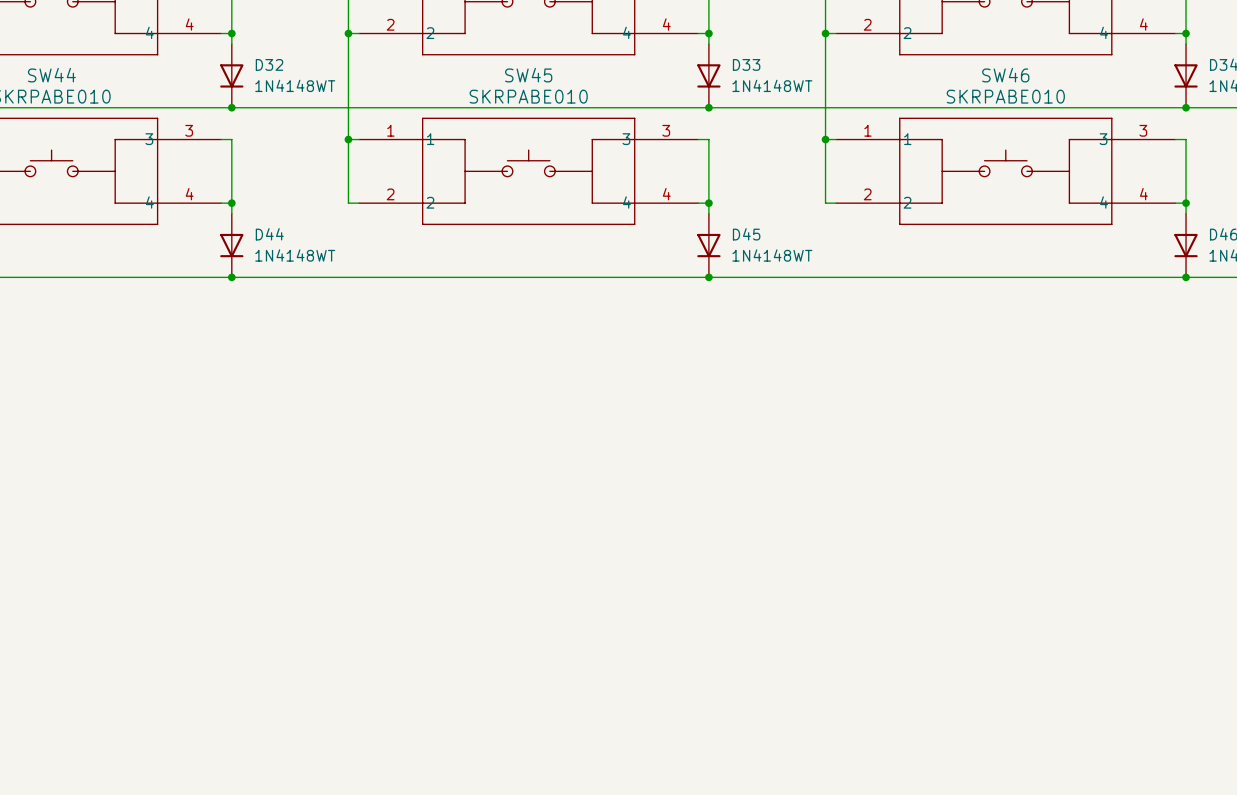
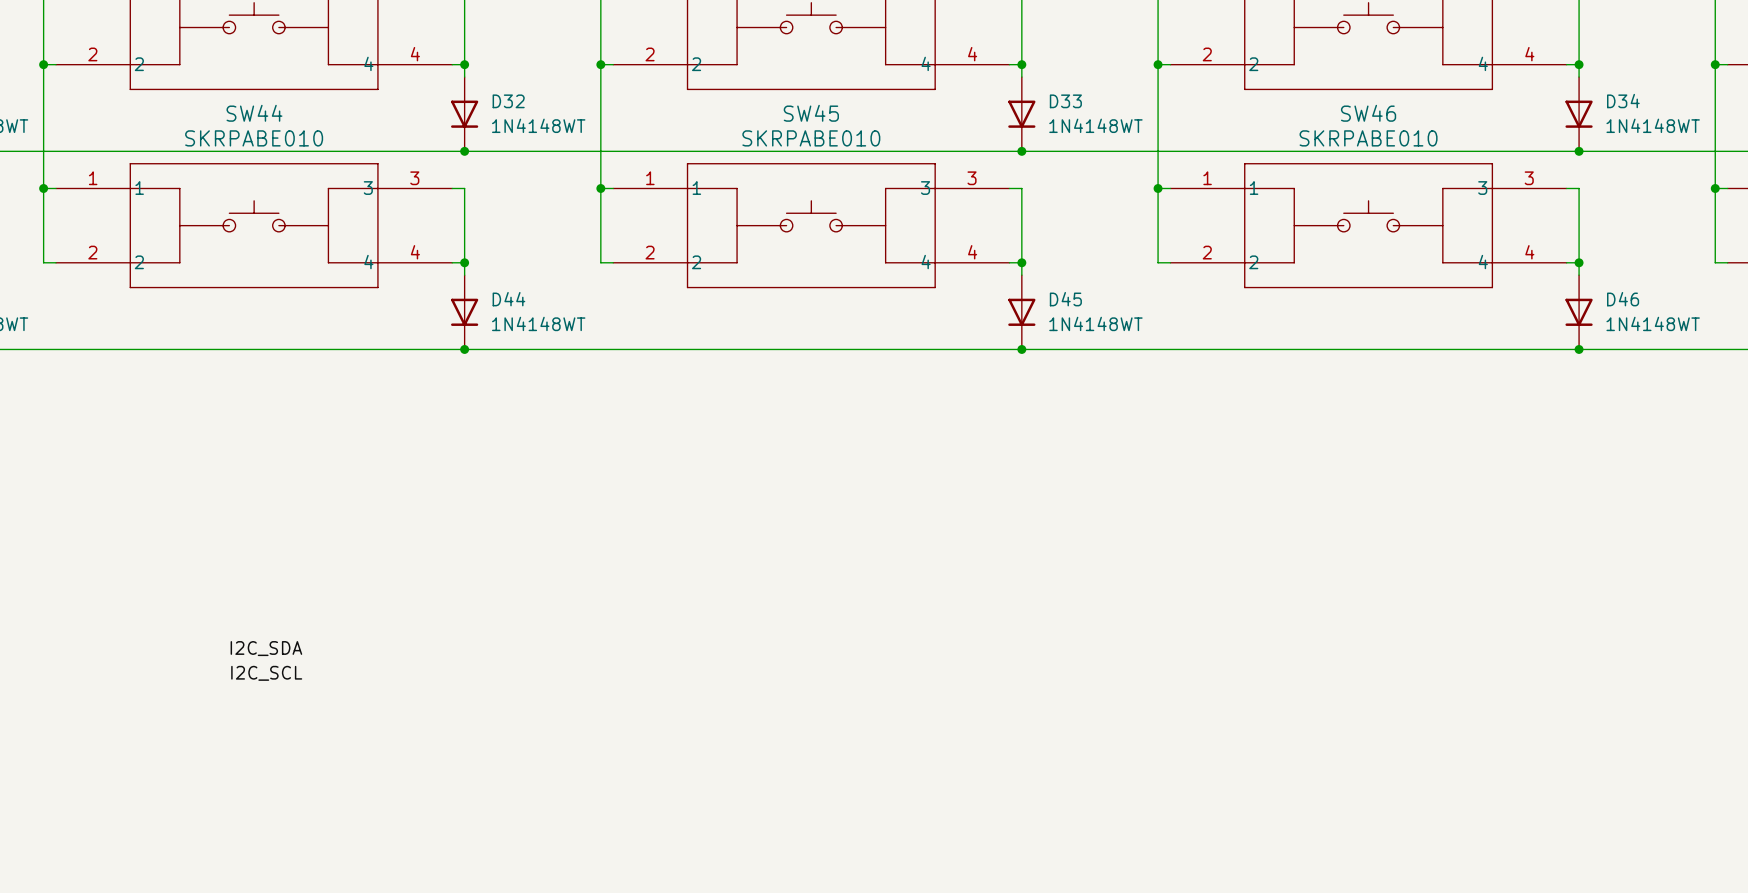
label: none -> I2C_SDA (266, 648)
label: none -> I2C_SCL (266, 673)

